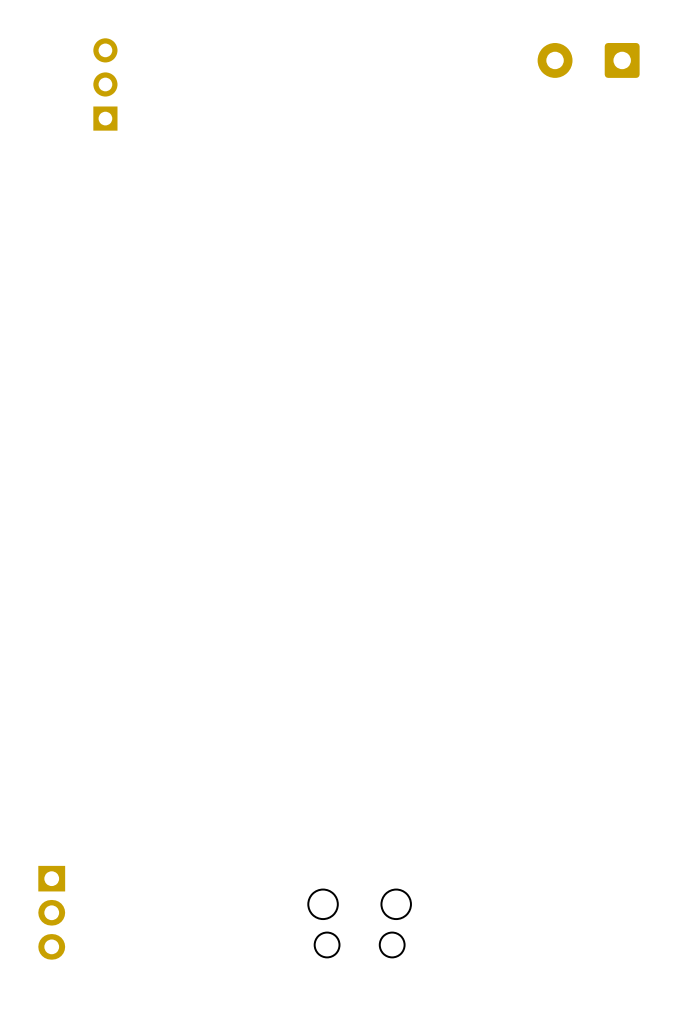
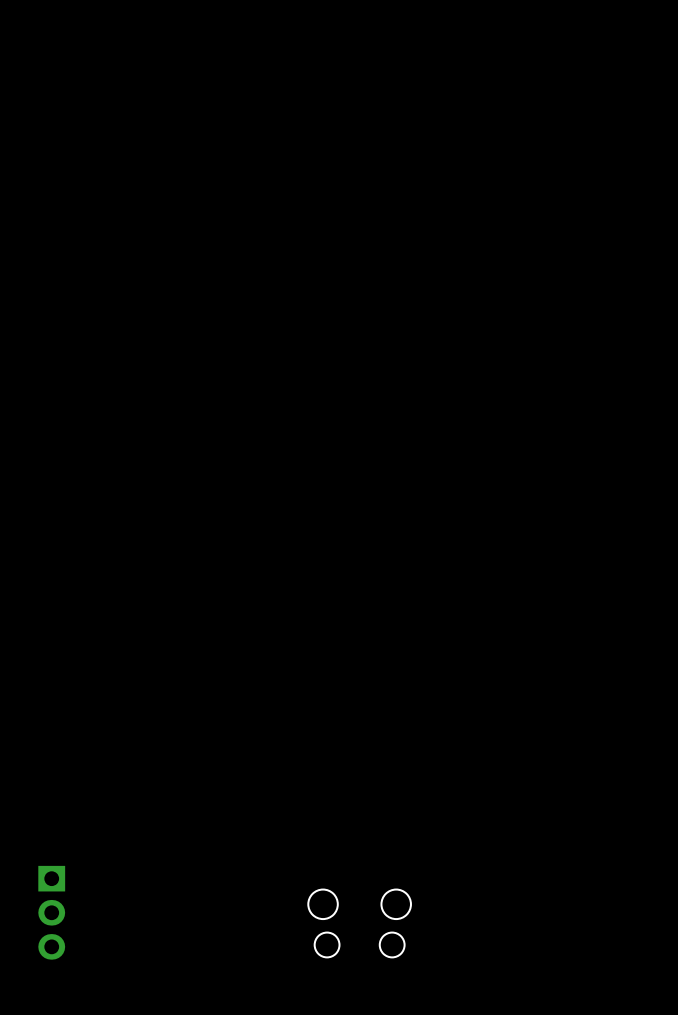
part: (588, 60) -> none
part: (105, 84) -> none

